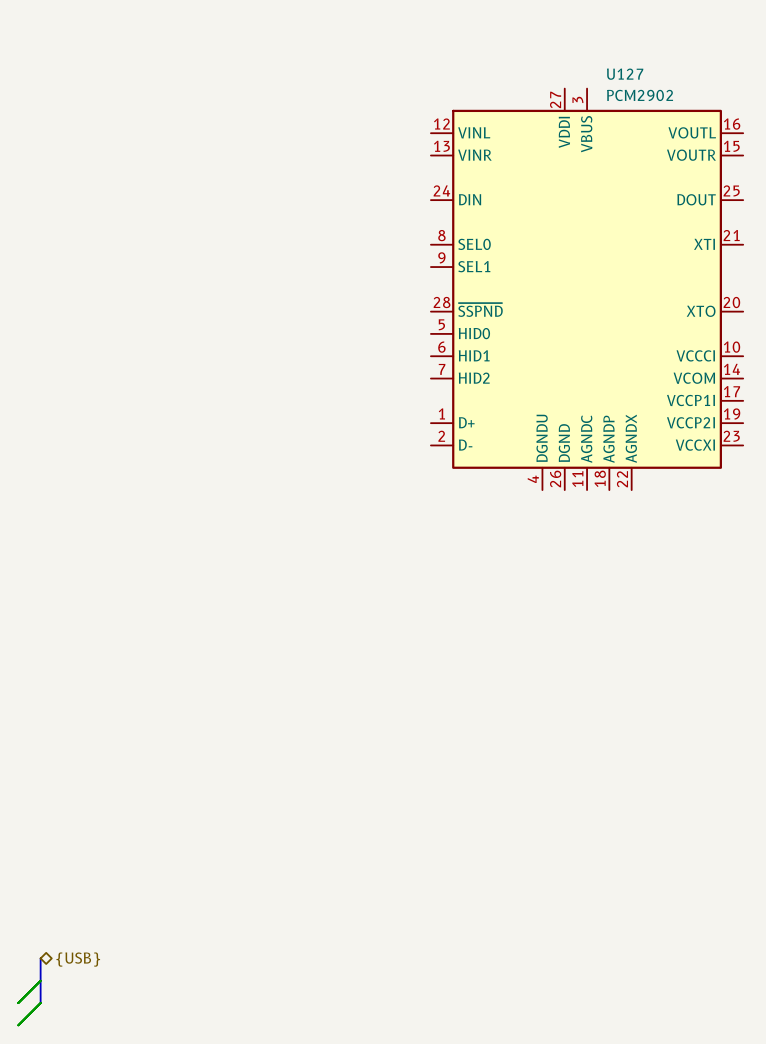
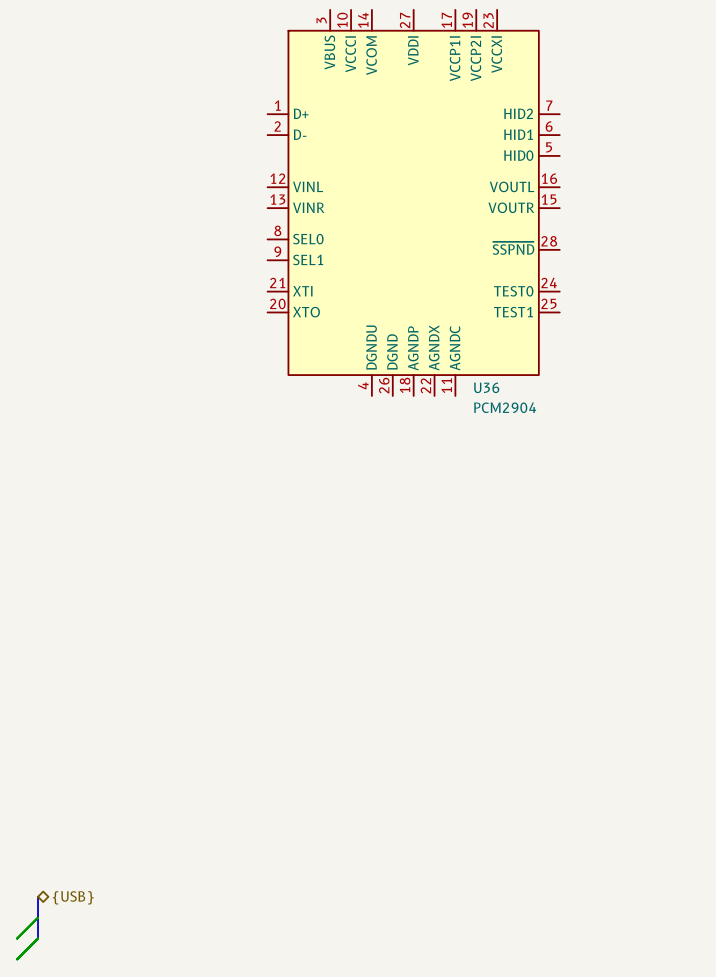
U36: none -> PCM2904 (413, 202)
U127: PCM2902 (587, 289) -> none

